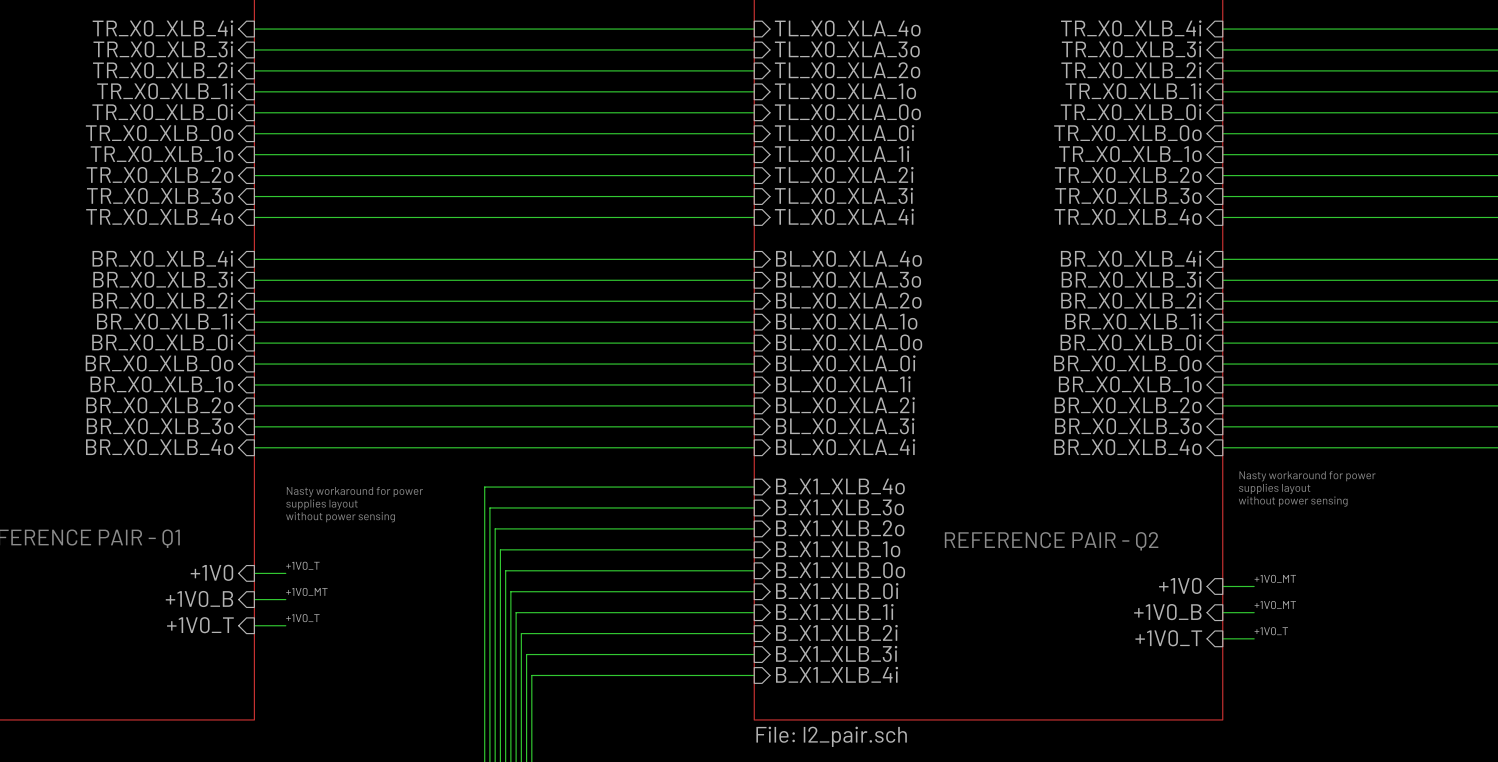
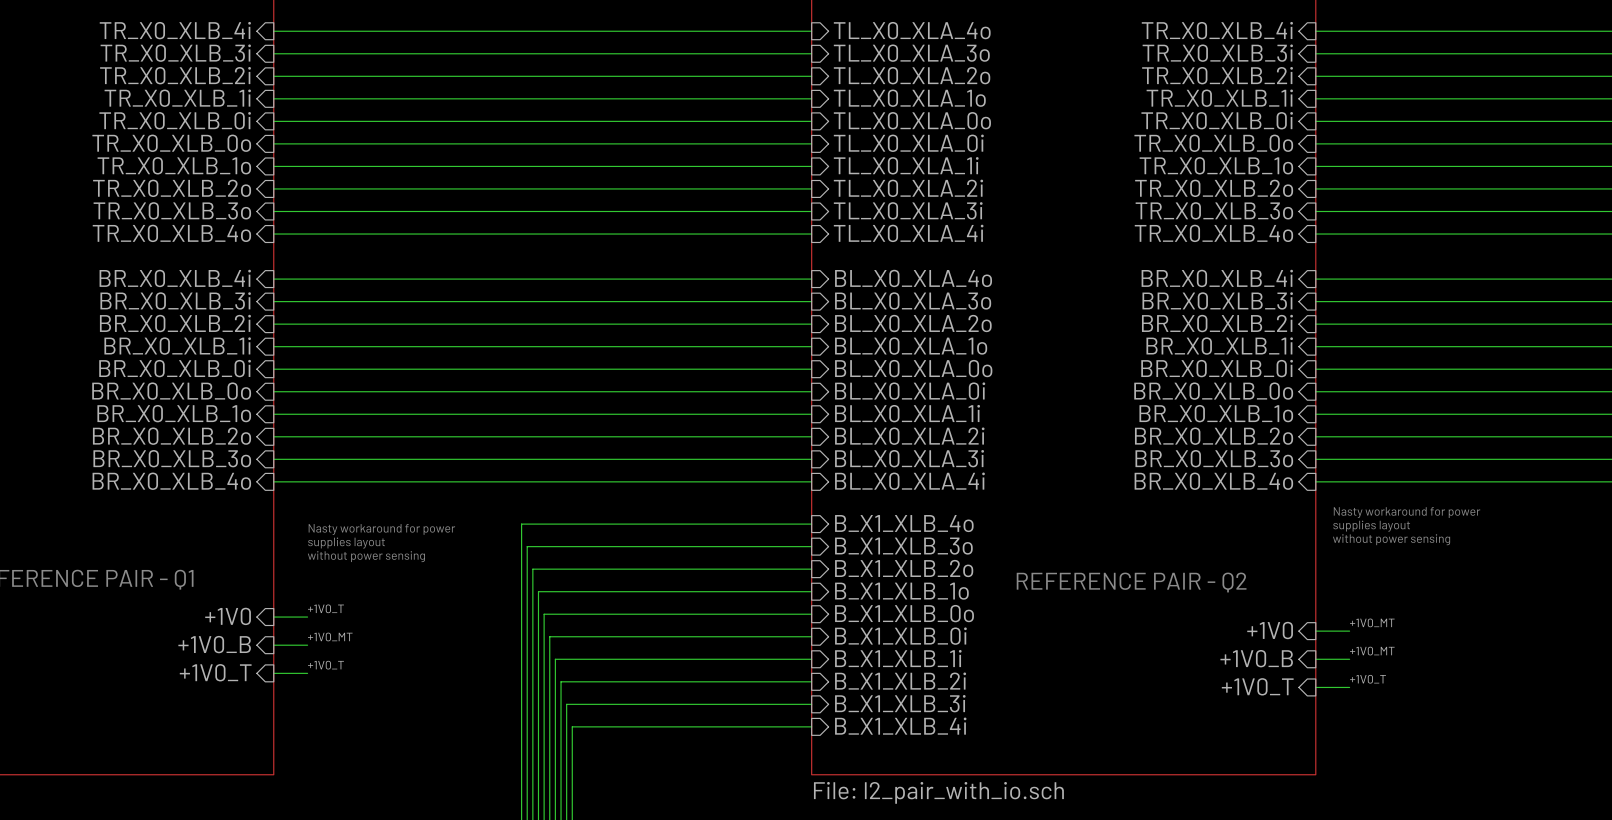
sheet value: File: l2_pair.sch (831, 736) -> File: l2_pair_with_io.sch (938, 792)

